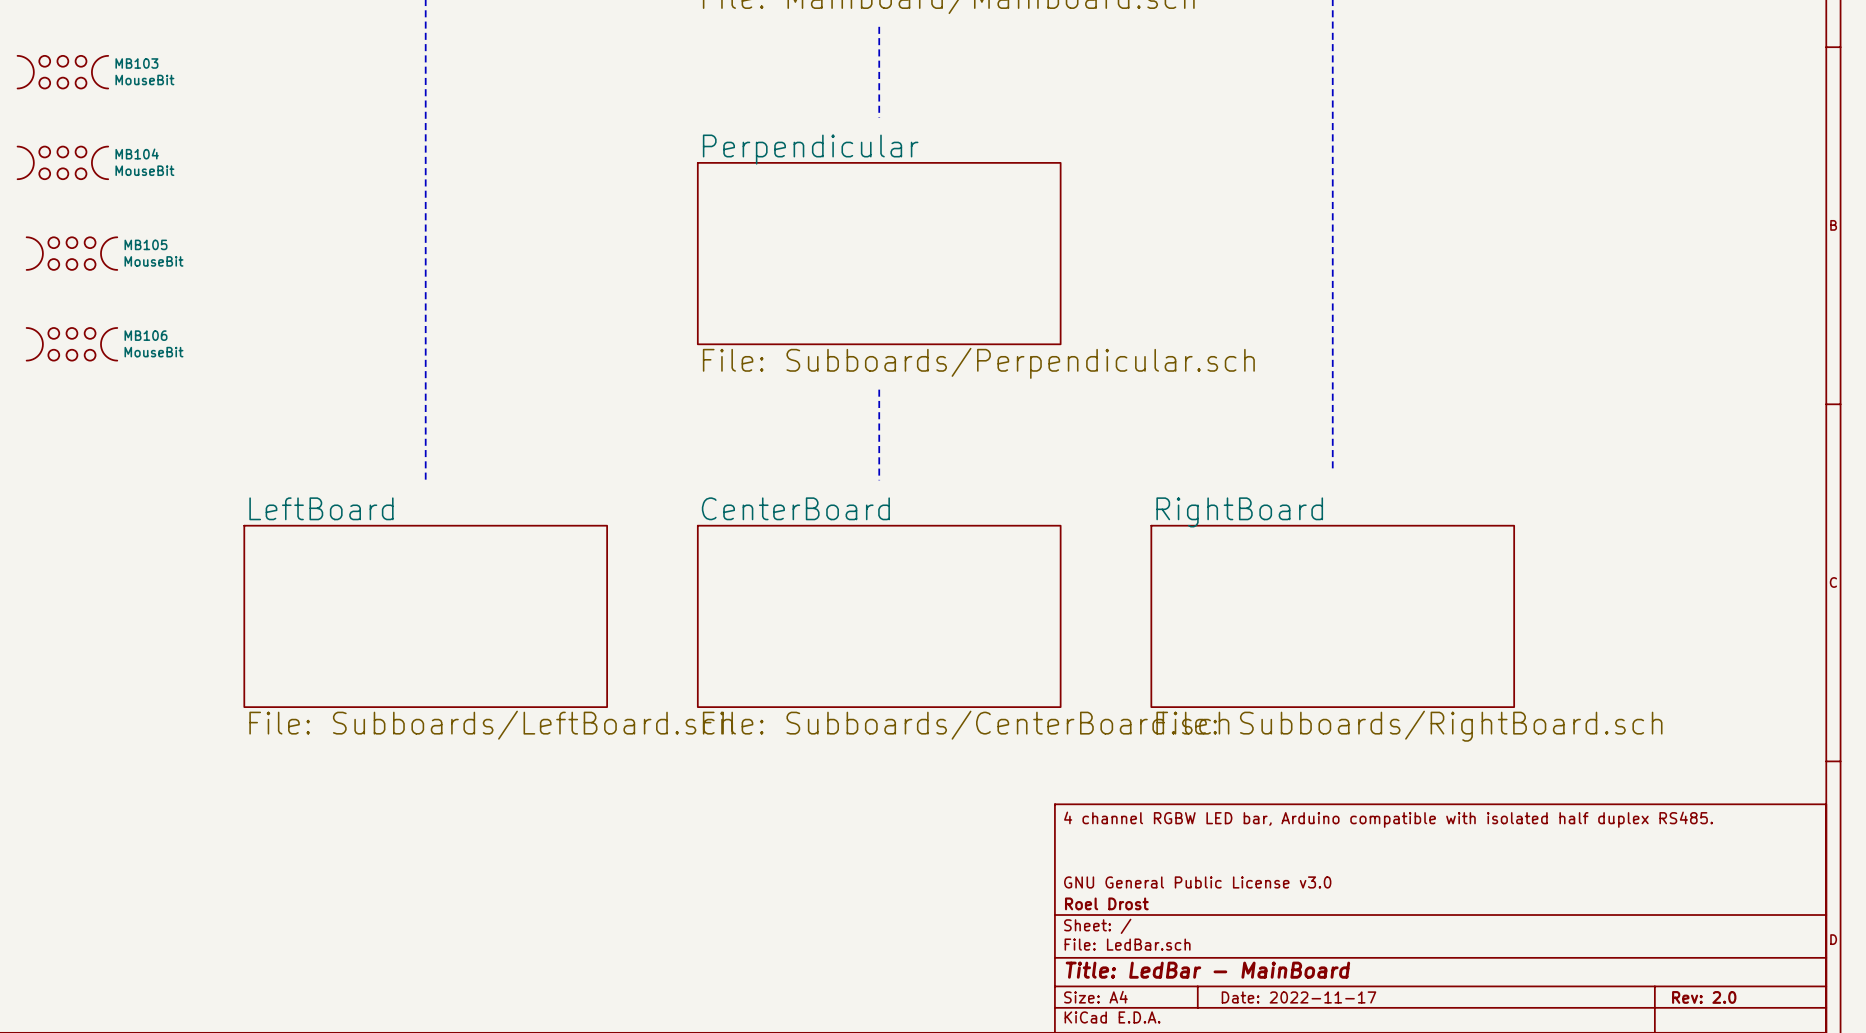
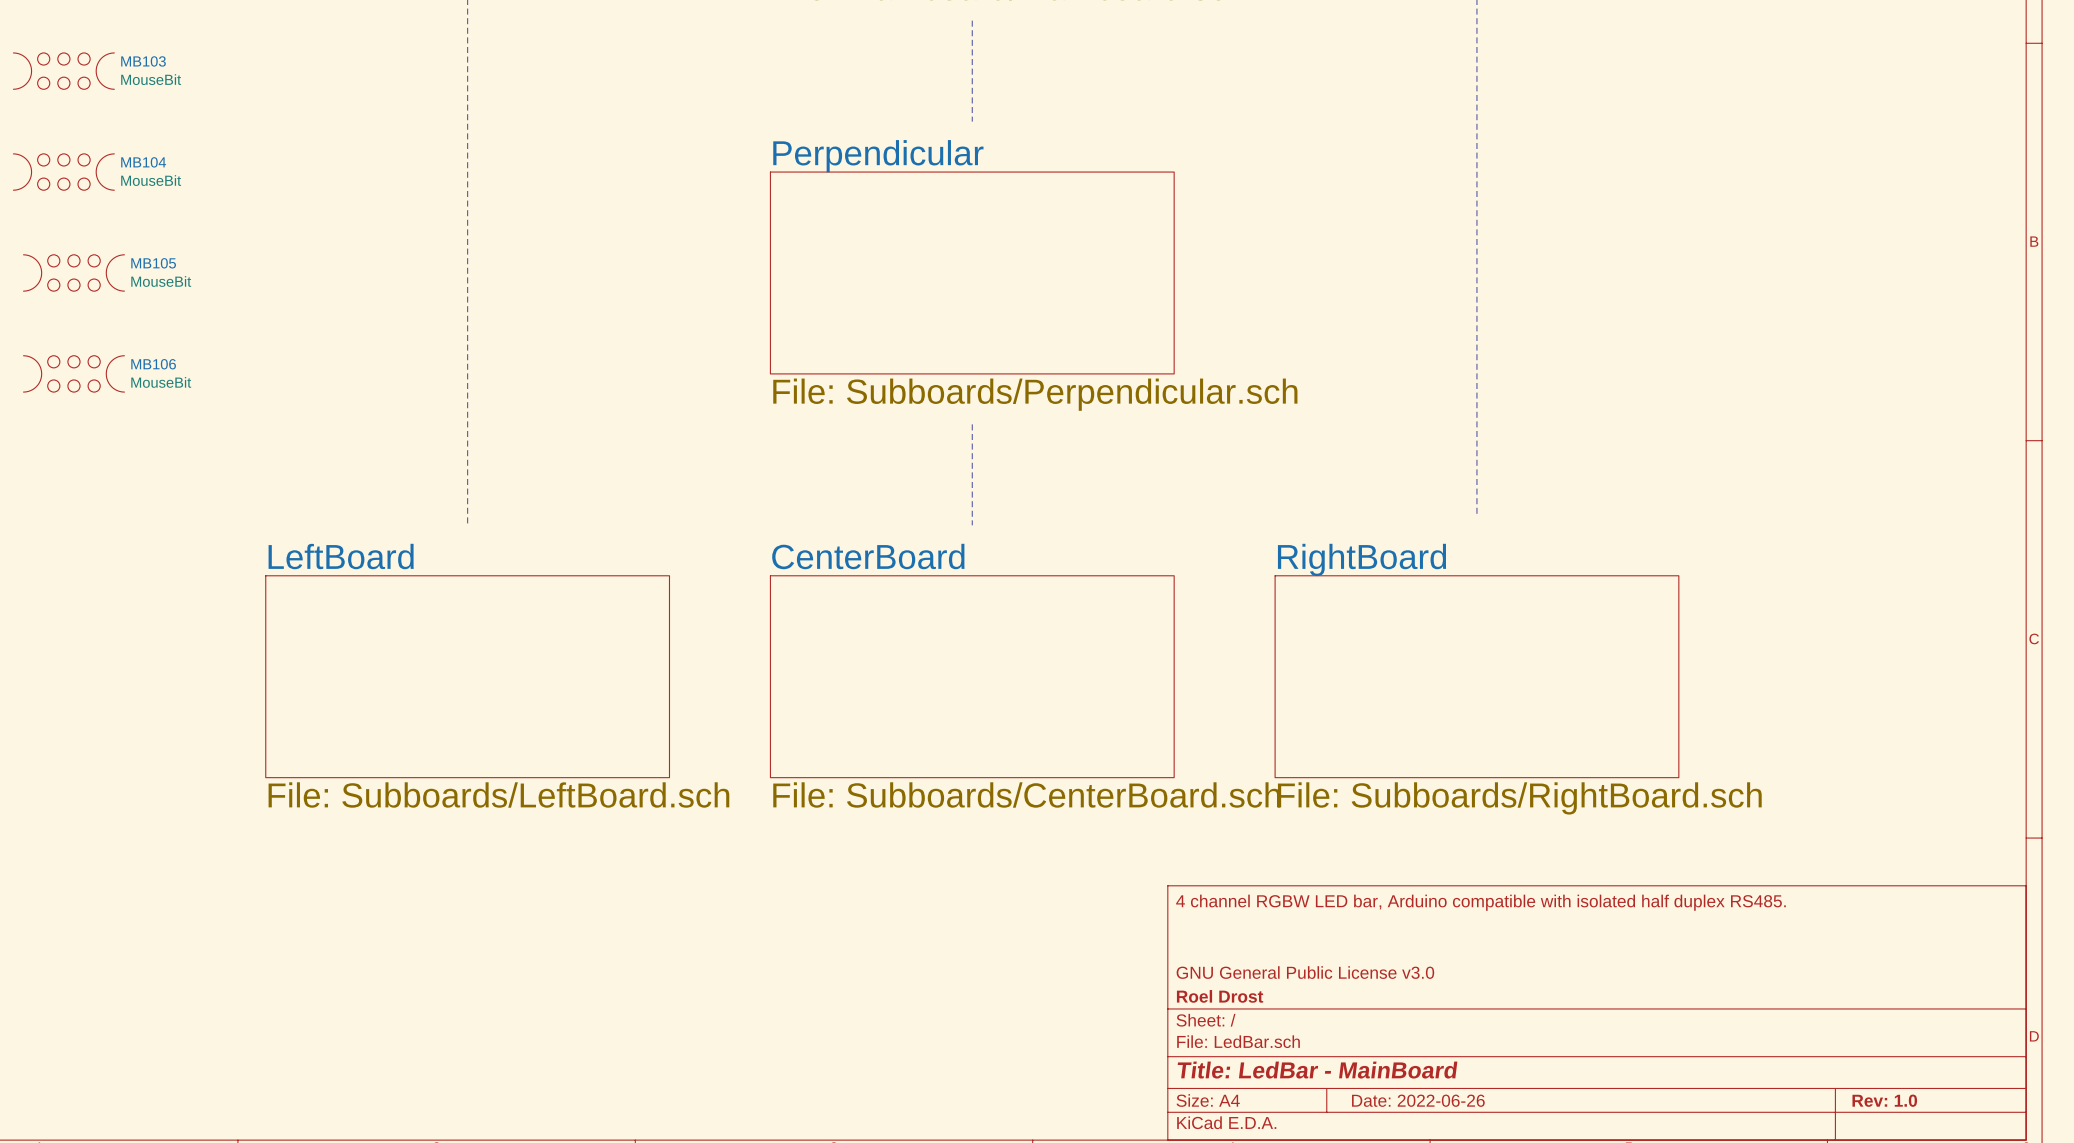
title block: Date: 2022-11-17 (1298, 997) -> Date: 2022-06-26 (1418, 1100)
title block: Rev: 2.0 (1704, 997) -> Rev: 1.0 (1884, 1100)

